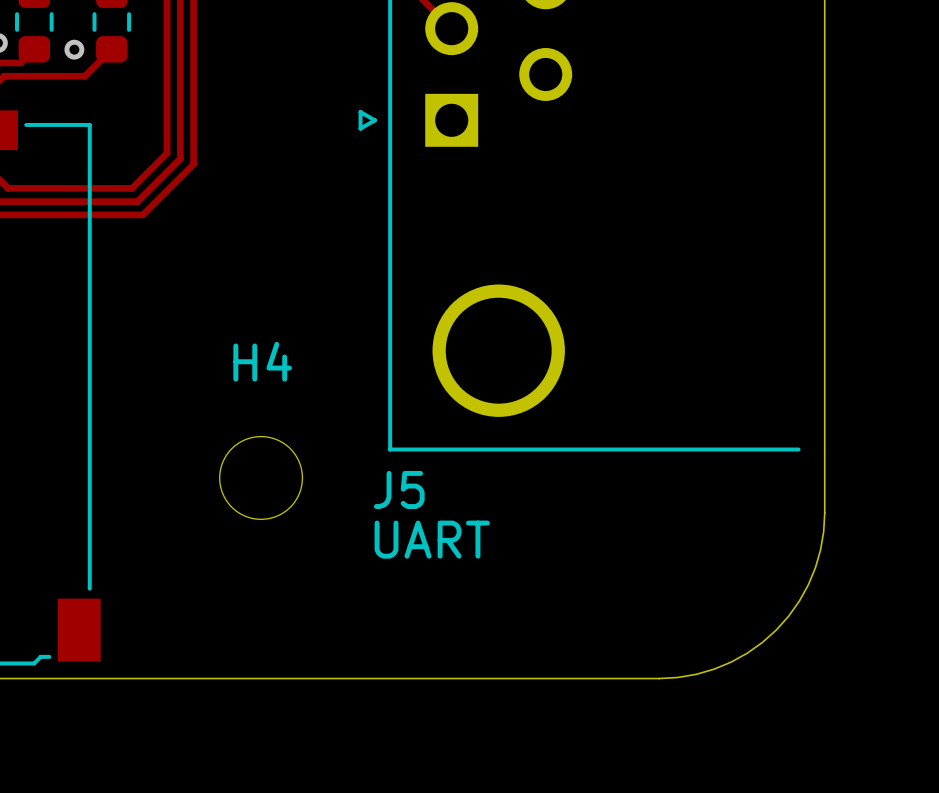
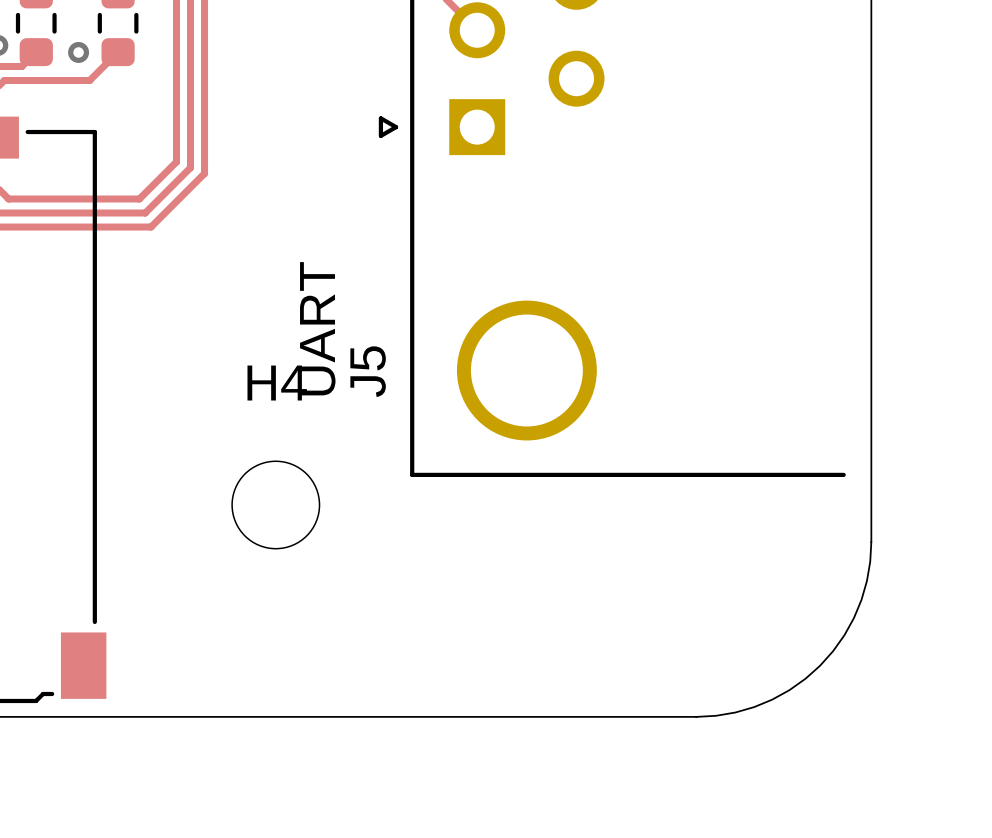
J5 name rotation: 0° (399, 489) -> 90° counterclockwise (368, 371)
J5 name position: J5 (399, 489) -> J5 (368, 371)
J5 value rotation: 0° (432, 539) -> 90° counterclockwise (317, 328)
J5 value position: UART (432, 539) -> UART (317, 328)

